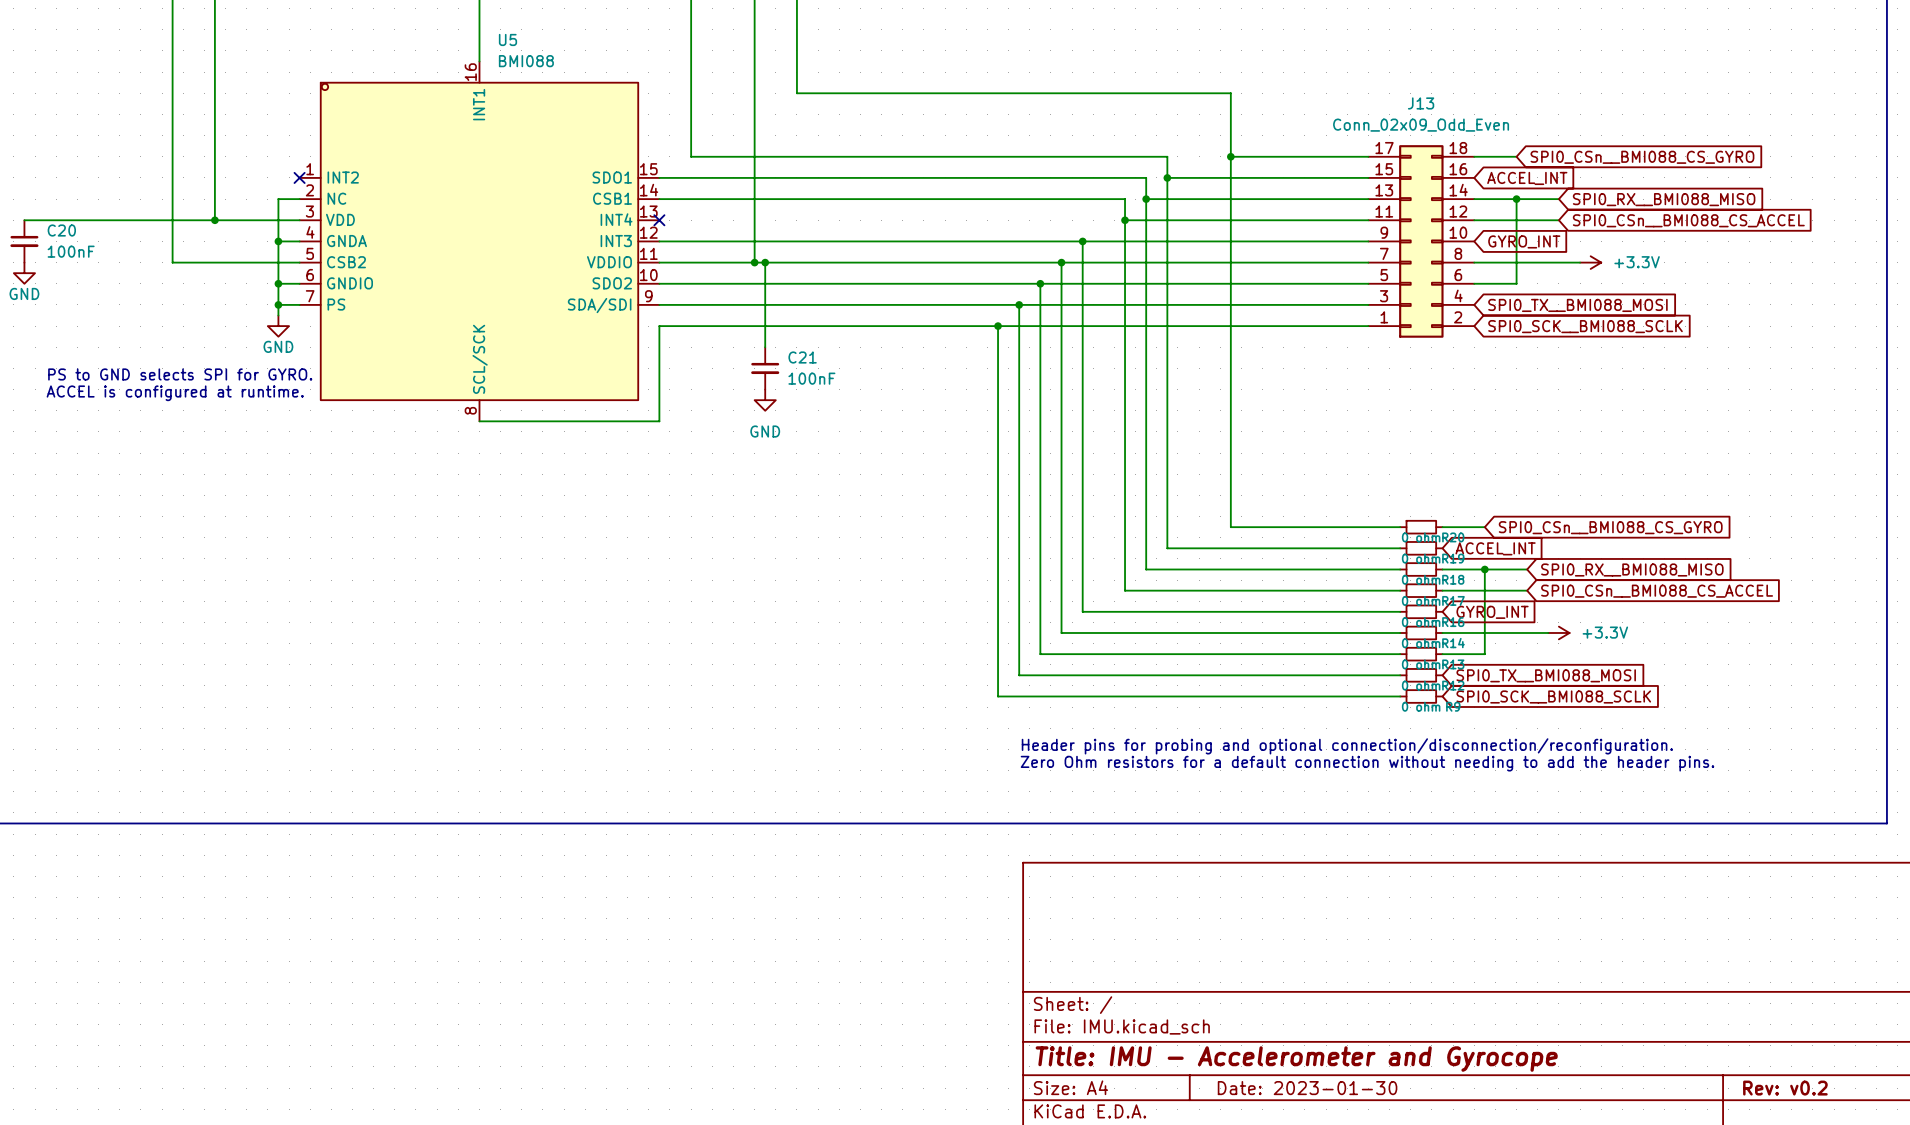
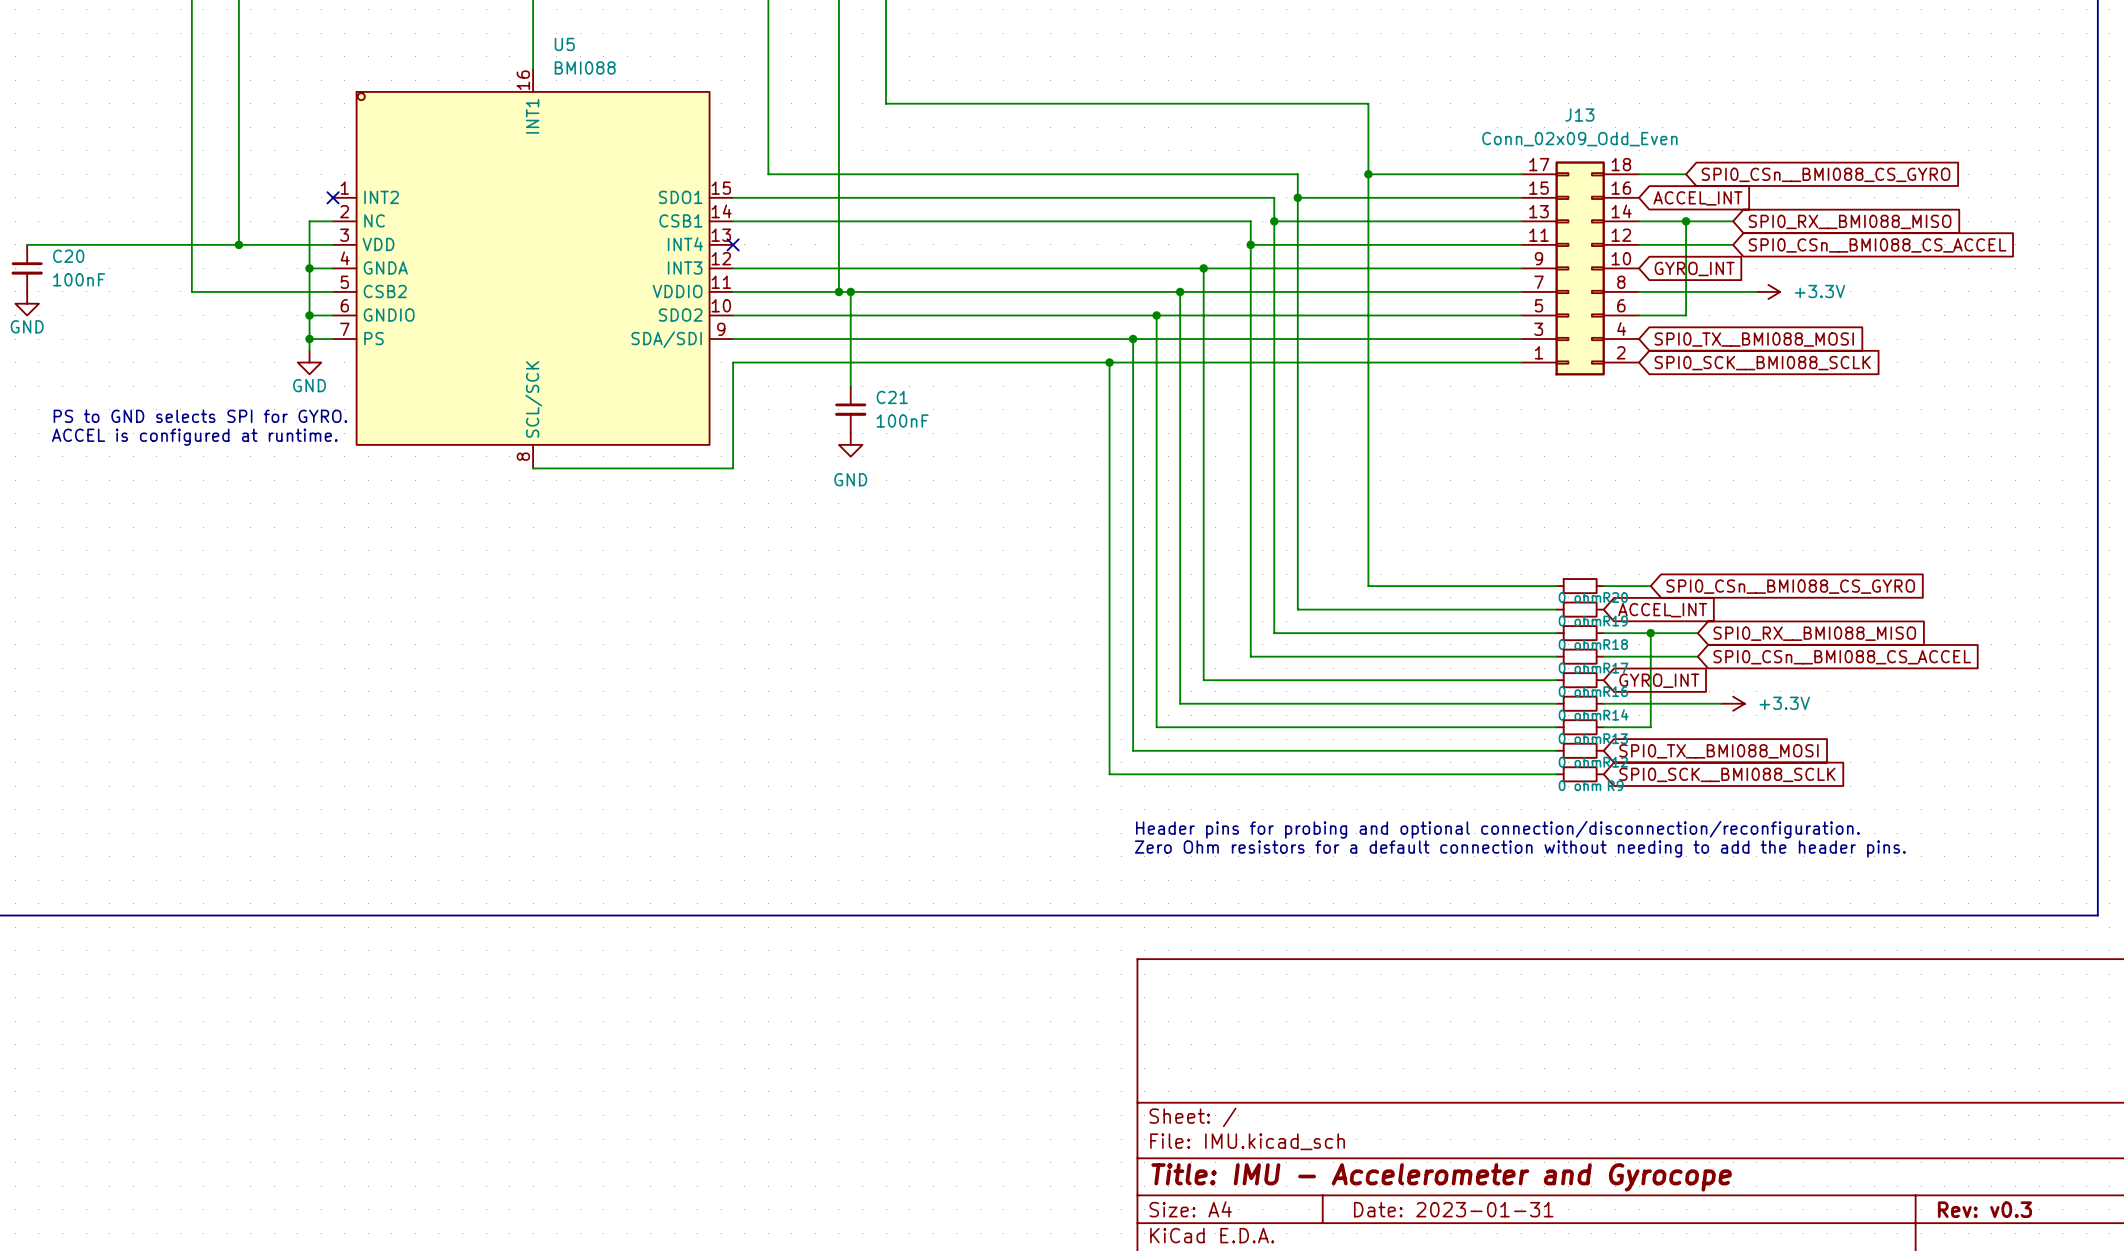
title block: Date: 2023-01-30 (1307, 1088) -> Date: 2023-01-31 (1453, 1209)
title block: Rev: v0.2 (1785, 1088) -> Rev: v0.3 (1984, 1209)

